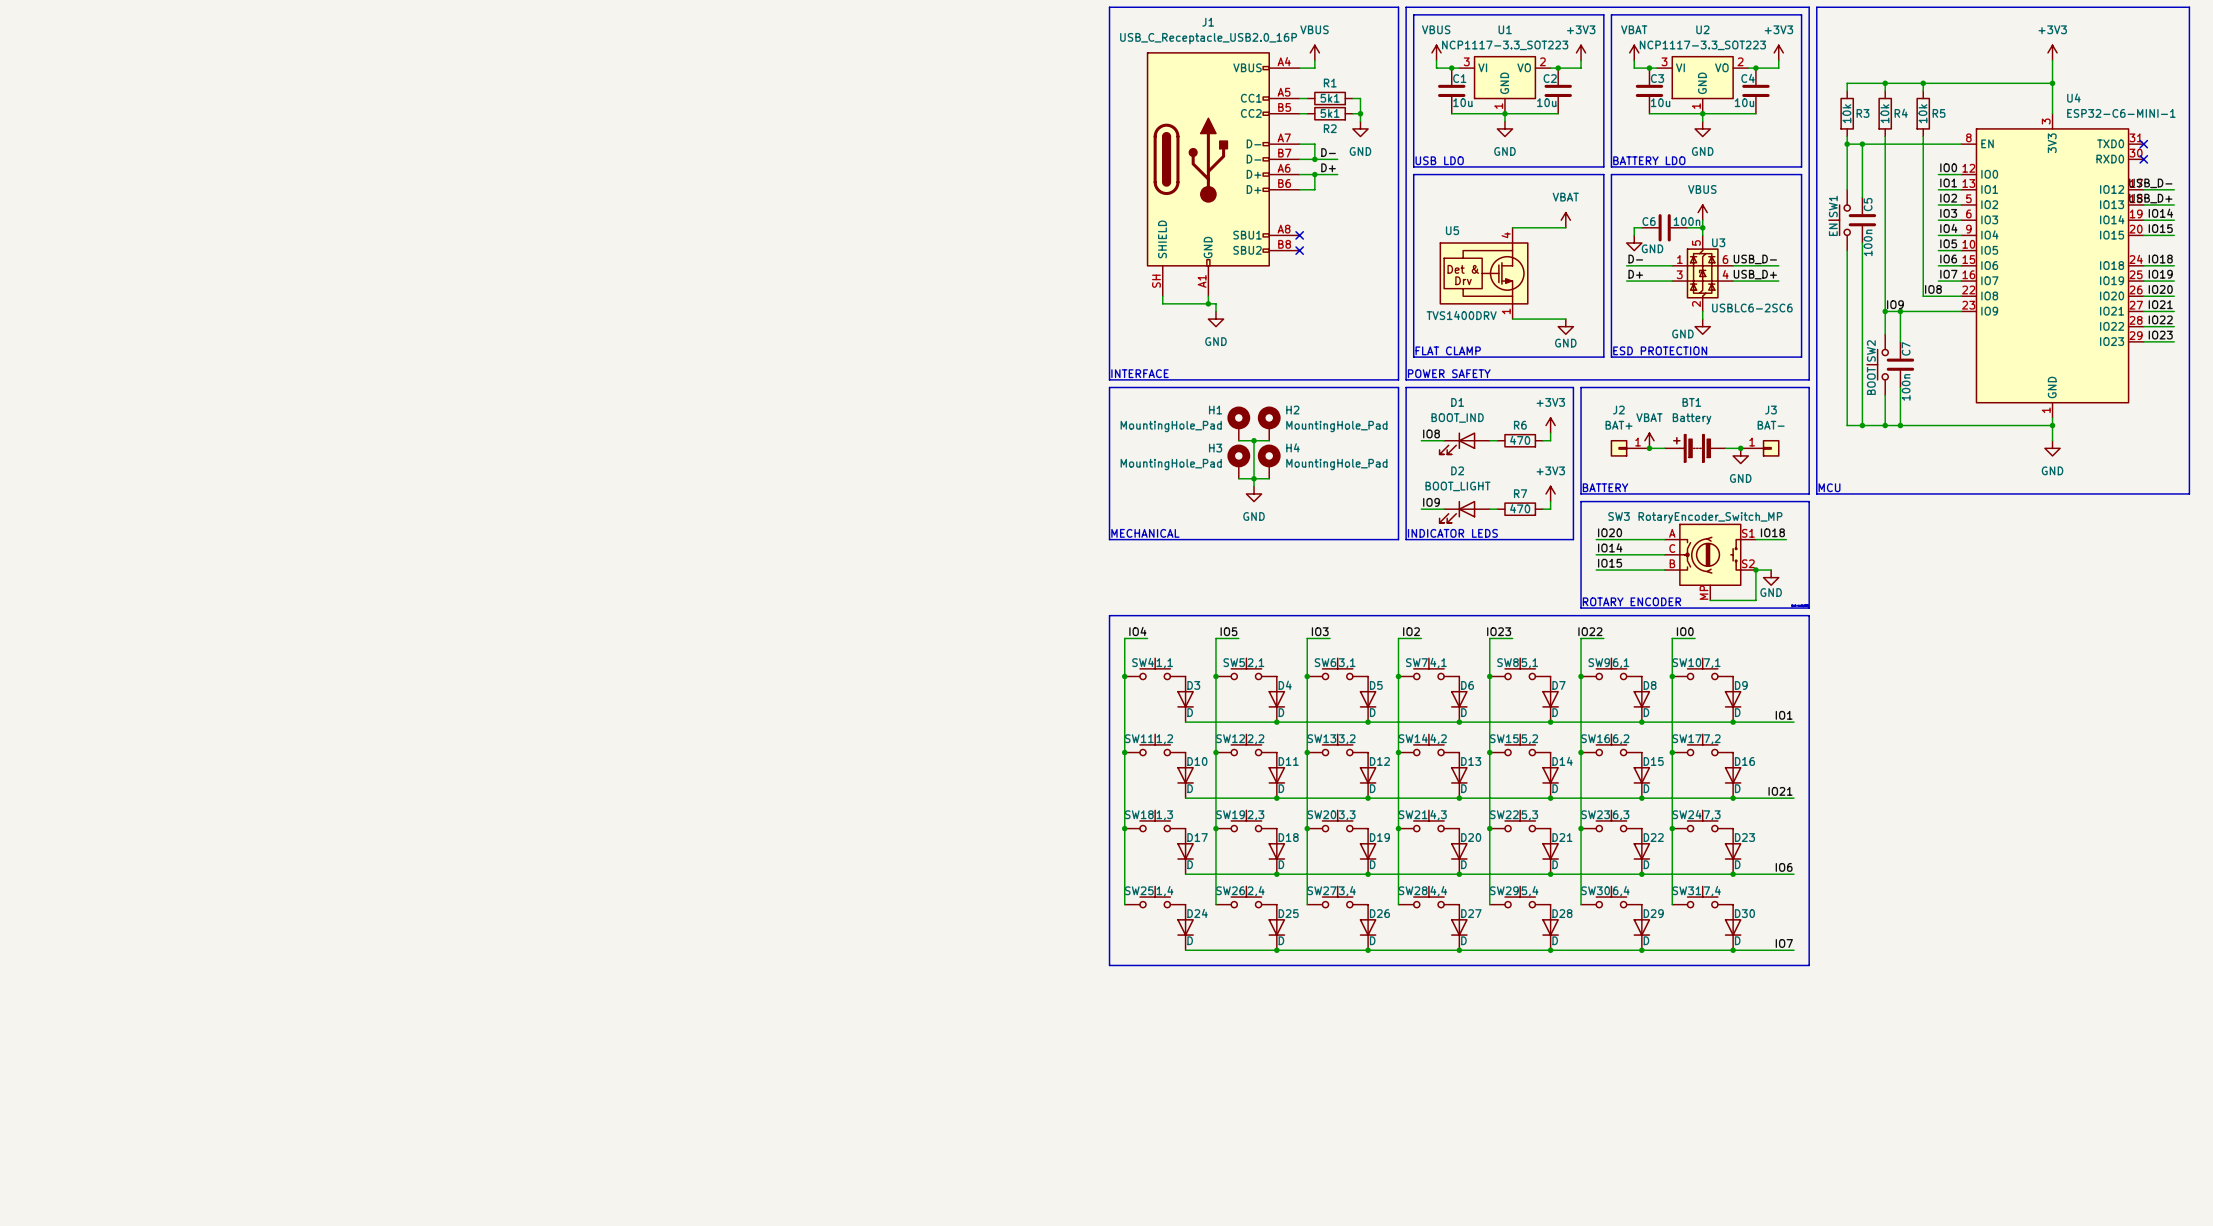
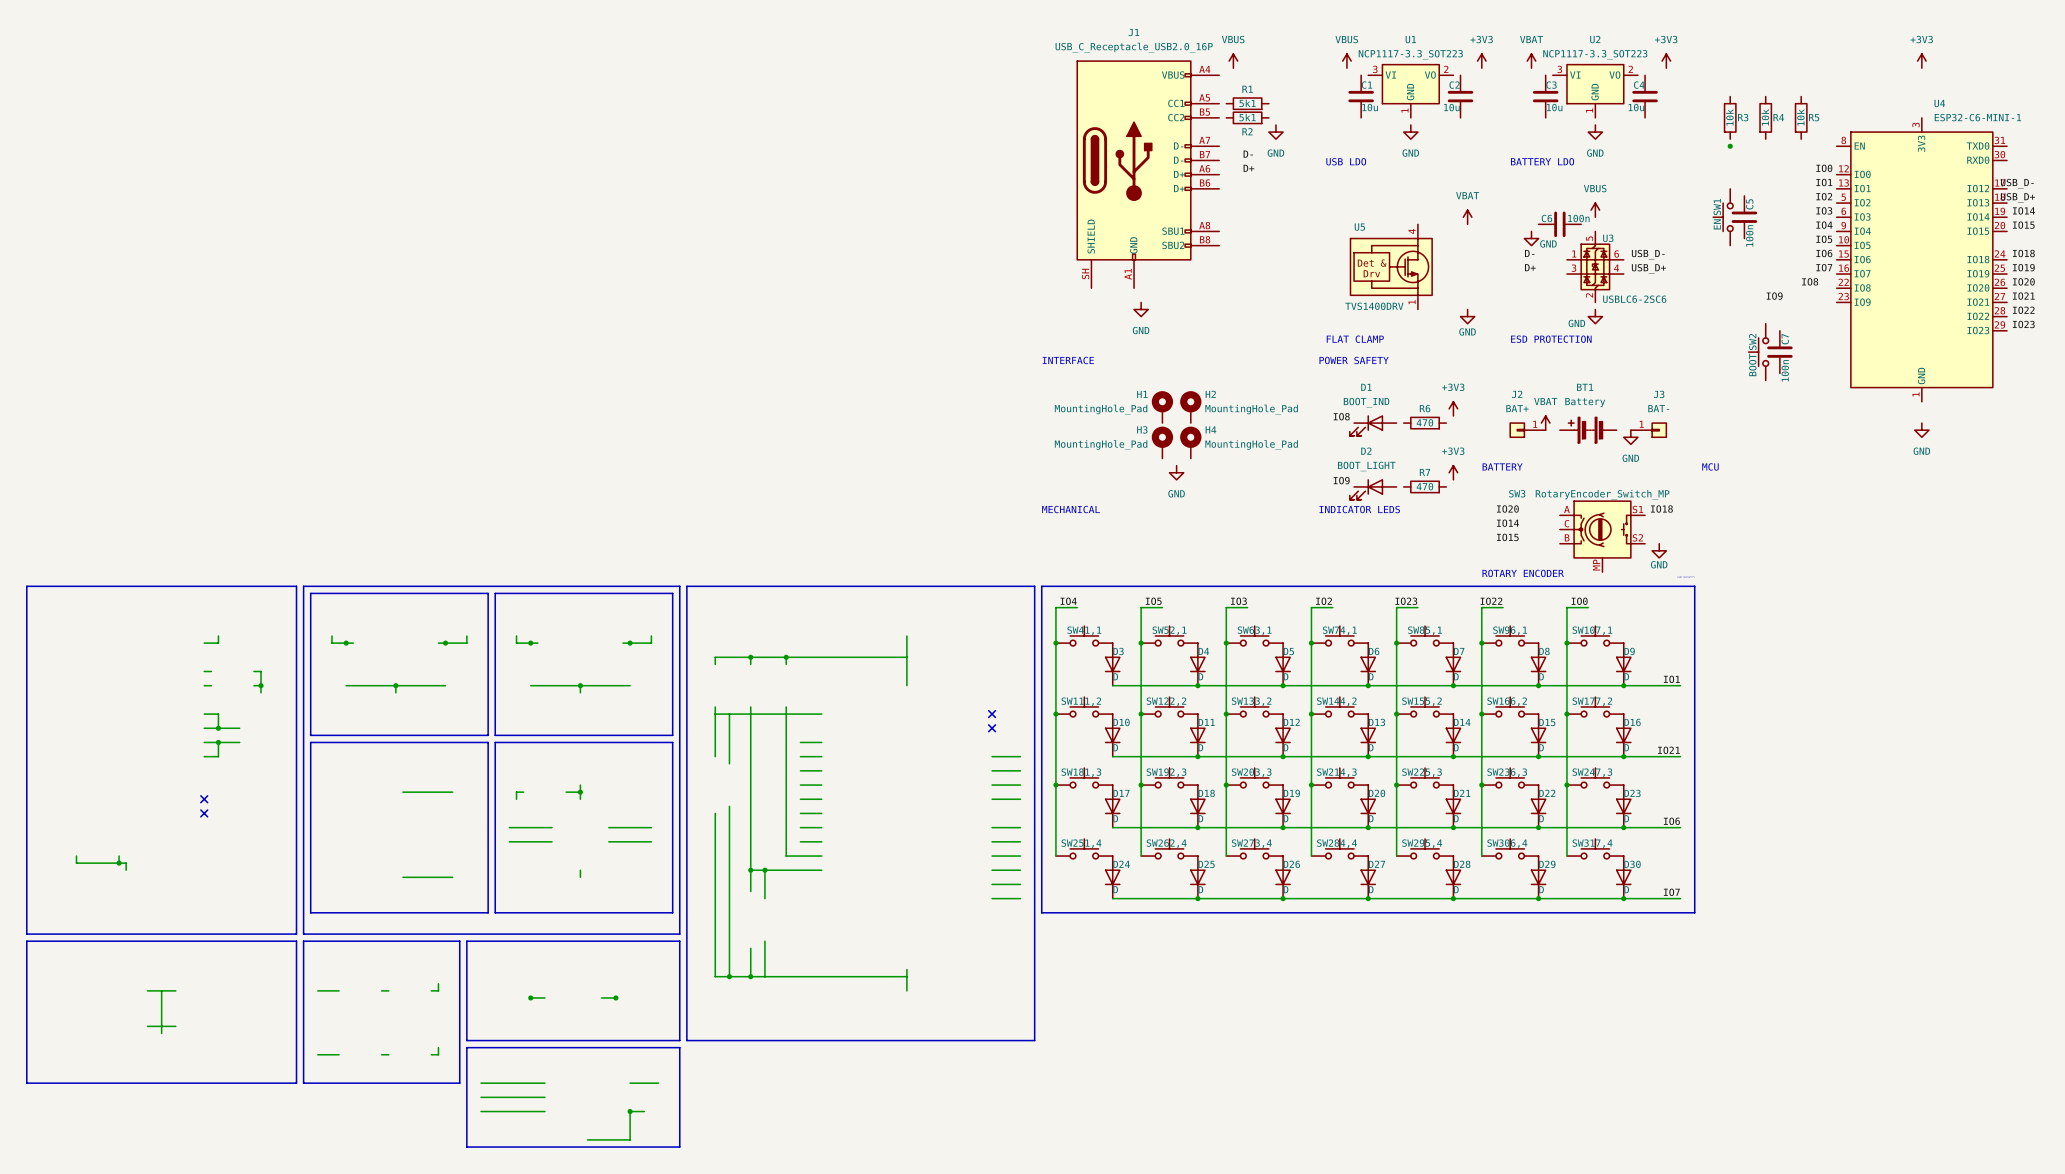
line: (1109, 7) (1109, 379) (1398, 379) (1398, 7) (1109, 7) -> none
line: (1406, 7) (1406, 379) (1809, 379) (1809, 7) (1406, 7) -> none
line: (1816, 7) (2189, 7) (2189, 493) (1816, 493) (1816, 7) -> none
line: (1413, 14) (1603, 14) (1603, 166) (1413, 166) (1413, 14) -> none
line: (1611, 14) (1801, 14) (1801, 166) (1611, 166) (1611, 14) -> none
wire: (1314, 60) (1314, 68) (1299, 68) -> none
wire: (1436, 60) (1436, 68) (1459, 68) -> none
wire: (1581, 60) (1581, 68) (1550, 68) -> none
wire: (1634, 60) (1634, 68) (1657, 68) -> none
wire: (1778, 60) (1778, 68) (1748, 68) -> none
wire: (2052, 60) (2052, 113) -> none
junction: (1451, 68) -> none
junction: (1558, 68) -> none
junction: (1649, 68) -> none
junction: (1755, 68) -> none
wire: (1885, 83) (1885, 90) -> none
junction: (1885, 83) -> none
wire: (1923, 83) (1923, 90) -> none
junction: (1923, 83) -> none
wire: (2052, 83) (1847, 83) (1847, 90) -> none
junction: (2052, 83) -> none
wire: (1299, 98) (1307, 98) -> none
wire: (1352, 98) (1360, 98) (1360, 121) -> none
wire: (1299, 113) (1307, 113) -> none
wire: (1352, 113) (1360, 113) -> none
junction: (1360, 113) -> none
wire: (1451, 113) (1558, 113) -> none
wire: (1504, 113) (1504, 121) -> none
junction: (1504, 113) -> none
wire: (1649, 113) (1755, 113) -> none
wire: (1702, 113) (1702, 121) -> none
junction: (1702, 113) -> none
wire: (1847, 136) (1847, 189) -> none
wire: (1885, 136) (1885, 334) -> none
wire: (1923, 136) (1923, 296) (1961, 296) -> none
wire: (1299, 144) (1314, 144) (1314, 159) -> none
wire: (1847, 144) (1961, 144) -> none
wire: (1862, 144) (1862, 197) -> none
junction: (1862, 144) -> none
no-connect mark: (2143, 144) -> none
wire: (1299, 159) (1337, 159) -> none
junction: (1314, 159) -> none
no-connect mark: (2143, 159) -> none
wire: (1299, 174) (1337, 174) -> none
wire: (1314, 174) (1314, 189) (1299, 189) -> none
junction: (1314, 174) -> none
line: (1413, 174) (1413, 357) (1603, 357) (1603, 174) (1413, 174) -> none
line: (1611, 174) (1801, 174) (1801, 357) (1611, 357) (1611, 174) -> none
wire: (1938, 174) (1961, 174) -> none
wire: (1938, 189) (1961, 189) -> none
wire: (2143, 189) (2174, 189) -> none
wire: (1938, 204) (1961, 204) -> none
wire: (2143, 204) (2174, 204) -> none
wire: (1702, 220) (1702, 235) -> none
wire: (1938, 220) (1961, 220) -> none
wire: (2143, 220) (2174, 220) -> none
wire: (1512, 227) (1565, 227) -> none
wire: (1641, 227) (1634, 227) (1634, 235) -> none
wire: (1687, 227) (1702, 227) -> none
junction: (1702, 227) -> none
no-connect mark: (1299, 235) -> none
wire: (1938, 235) (1961, 235) -> none
wire: (2143, 235) (2174, 235) -> none
wire: (1862, 243) (1862, 425) -> none
no-connect mark: (1299, 250) -> none
wire: (1847, 250) (1847, 425) (2052, 425) -> none
wire: (1938, 250) (1961, 250) -> none
wire: (1626, 265) (1672, 265) -> none
wire: (1733, 265) (1778, 265) -> none
wire: (1938, 265) (1961, 265) -> none
wire: (2143, 265) (2174, 265) -> none
wire: (1626, 281) (1672, 281) -> none
wire: (1733, 281) (1778, 281) -> none
wire: (1938, 281) (1961, 281) -> none
wire: (2143, 281) (2174, 281) -> none
wire: (1162, 296) (1162, 303) (1215, 303) (1215, 311) -> none
wire: (1208, 296) (1208, 303) -> none
wire: (2143, 296) (2174, 296) -> none
junction: (1208, 303) -> none
wire: (1702, 311) (1702, 319) -> none
wire: (1885, 311) (1961, 311) -> none
junction: (1885, 311) -> none
wire: (1900, 311) (1900, 341) -> none
junction: (1900, 311) -> none
wire: (2143, 311) (2174, 311) -> none
wire: (1512, 319) (1565, 319) -> none
wire: (2143, 326) (2174, 326) -> none
wire: (2143, 341) (2174, 341) -> none
line: (1109, 387) (1109, 539) (1398, 539) (1398, 387) (1109, 387) -> none
line: (1406, 387) (1573, 387) (1573, 539) (1406, 539) (1406, 387) -> none
line: (1581, 387) (1809, 387) (1809, 493) (1581, 493) (1581, 387) -> none
wire: (1900, 387) (1900, 425) -> none
wire: (1885, 395) (1885, 425) -> none
wire: (2052, 417) (2052, 440) -> none
junction: (1862, 425) -> none
junction: (1885, 425) -> none
junction: (1900, 425) -> none
junction: (2052, 425) -> none
wire: (1550, 433) (1550, 440) (1543, 440) -> none
wire: (1238, 440) (1269, 440) -> none
wire: (1254, 440) (1254, 486) -> none
junction: (1254, 440) -> none
wire: (1421, 440) (1444, 440) -> none
wire: (1489, 440) (1497, 440) -> none
wire: (1649, 448) (1664, 448) -> none
junction: (1649, 448) -> none
wire: (1725, 448) (1740, 448) -> none
junction: (1740, 448) -> none
wire: (1238, 478) (1269, 478) -> none
junction: (1254, 478) -> none
wire: (1550, 501) (1550, 509) (1543, 509) -> none
line: (1581, 501) (1809, 501) (1809, 608) (1581, 608) (1581, 501) -> none
wire: (1421, 509) (1444, 509) -> none
wire: (1489, 509) (1497, 509) -> none
wire: (1596, 539) (1664, 539) -> none
wire: (1755, 539) (1786, 539) -> none
wire: (1596, 554) (1664, 554) -> none
wire: (1596, 570) (1664, 570) -> none
junction: (1755, 570) -> none
wire: (1771, 570) (1755, 570) (1755, 600) (1710, 600) -> none
line: none -> (26, 586) (296, 586) (296, 934) (26, 934) (26, 586)
line: none -> (303, 586) (679, 586) (679, 934) (303, 934) (303, 586)
line: none -> (686, 586) (1034, 586) (1034, 1040) (686, 1040) (686, 586)
line: none -> (310, 593) (488, 593) (488, 735) (310, 735) (310, 593)
line: none -> (495, 593) (672, 593) (672, 735) (495, 735) (495, 593)
wire: none -> (218, 636) (218, 643) (204, 643)
wire: none -> (331, 636) (331, 643) (353, 643)
wire: none -> (466, 636) (466, 643) (438, 643)
wire: none -> (516, 636) (516, 643) (537, 643)
wire: none -> (651, 636) (651, 643) (622, 643)
wire: none -> (906, 636) (906, 685)
junction: none -> (346, 643)
junction: none -> (445, 643)
junction: none -> (530, 643)
junction: none -> (630, 643)
wire: none -> (750, 657) (750, 664)
junction: none -> (750, 657)
wire: none -> (786, 657) (786, 664)
junction: none -> (786, 657)
wire: none -> (906, 657) (715, 657) (715, 664)
wire: none -> (204, 671) (211, 671)
wire: none -> (253, 671) (261, 671) (261, 692)
wire: none -> (204, 685) (211, 685)
wire: none -> (253, 685) (261, 685)
junction: none -> (261, 685)
wire: none -> (346, 685) (445, 685)
wire: none -> (395, 685) (395, 692)
junction: none -> (395, 685)
wire: none -> (530, 685) (630, 685)
wire: none -> (580, 685) (580, 692)
junction: none -> (580, 685)
wire: none -> (715, 706) (715, 756)
wire: none -> (750, 706) (750, 891)
wire: none -> (786, 706) (786, 856) (821, 856)
wire: none -> (204, 714) (218, 714) (218, 728)
wire: none -> (715, 714) (821, 714)
wire: none -> (729, 714) (729, 763)
no-connect mark: none -> (992, 714)
wire: none -> (204, 728) (239, 728)
junction: none -> (218, 728)
no-connect mark: none -> (992, 728)
wire: none -> (204, 742) (239, 742)
wire: none -> (218, 742) (218, 756) (204, 756)
junction: none -> (218, 742)
line: none -> (310, 742) (310, 912) (488, 912) (488, 742) (310, 742)
line: none -> (495, 742) (672, 742) (672, 912) (495, 912) (495, 742)
wire: none -> (800, 742) (821, 742)
wire: none -> (800, 756) (821, 756)
wire: none -> (992, 756) (1020, 756)
wire: none -> (800, 770) (821, 770)
wire: none -> (992, 770) (1020, 770)
wire: none -> (580, 785) (580, 799)
wire: none -> (800, 785) (821, 785)
wire: none -> (992, 785) (1020, 785)
wire: none -> (402, 792) (452, 792)
wire: none -> (523, 792) (516, 792) (516, 799)
wire: none -> (566, 792) (580, 792)
junction: none -> (580, 792)
no-connect mark: none -> (204, 799)
wire: none -> (800, 799) (821, 799)
wire: none -> (992, 799) (1020, 799)
wire: none -> (729, 806) (729, 976)
no-connect mark: none -> (204, 813)
wire: none -> (715, 813) (715, 976) (906, 976)
wire: none -> (800, 813) (821, 813)
wire: none -> (509, 827) (552, 827)
wire: none -> (608, 827) (651, 827)
wire: none -> (800, 827) (821, 827)
wire: none -> (992, 827) (1020, 827)
wire: none -> (509, 841) (552, 841)
wire: none -> (608, 841) (651, 841)
wire: none -> (800, 841) (821, 841)
wire: none -> (992, 841) (1020, 841)
wire: none -> (76, 856) (76, 863) (126, 863) (126, 870)
wire: none -> (119, 856) (119, 863)
wire: none -> (992, 856) (1020, 856)
junction: none -> (119, 863)
wire: none -> (580, 870) (580, 877)
wire: none -> (750, 870) (821, 870)
junction: none -> (750, 870)
wire: none -> (764, 870) (764, 898)
junction: none -> (764, 870)
wire: none -> (992, 870) (1020, 870)
wire: none -> (402, 877) (452, 877)
wire: none -> (992, 884) (1020, 884)
wire: none -> (992, 898) (1020, 898)
line: none -> (26, 941) (296, 941) (296, 1083) (26, 1083) (26, 941)
line: none -> (303, 941) (459, 941) (459, 1083) (303, 1083) (303, 941)
line: none -> (466, 941) (679, 941) (679, 1040) (466, 1040) (466, 941)
wire: none -> (764, 941) (764, 976)
wire: none -> (750, 948) (750, 976)
wire: none -> (906, 969) (906, 990)
junction: none -> (729, 976)
junction: none -> (750, 976)
wire: none -> (438, 983) (438, 990) (431, 990)
wire: none -> (147, 990) (175, 990)
wire: none -> (161, 990) (161, 1033)
wire: none -> (317, 990) (339, 990)
wire: none -> (381, 990) (388, 990)
wire: none -> (530, 997) (544, 997)
junction: none -> (530, 997)
wire: none -> (601, 997) (615, 997)
junction: none -> (615, 997)
wire: none -> (147, 1026) (175, 1026)
wire: none -> (438, 1047) (438, 1054) (431, 1054)
line: none -> (466, 1047) (679, 1047) (679, 1147) (466, 1147) (466, 1047)
wire: none -> (317, 1054) (339, 1054)
wire: none -> (381, 1054) (388, 1054)
wire: none -> (481, 1083) (544, 1083)
wire: none -> (630, 1083) (658, 1083)
wire: none -> (481, 1097) (544, 1097)
wire: none -> (481, 1111) (544, 1111)
junction: none -> (630, 1111)
wire: none -> (644, 1111) (630, 1111) (630, 1139) (587, 1139)

